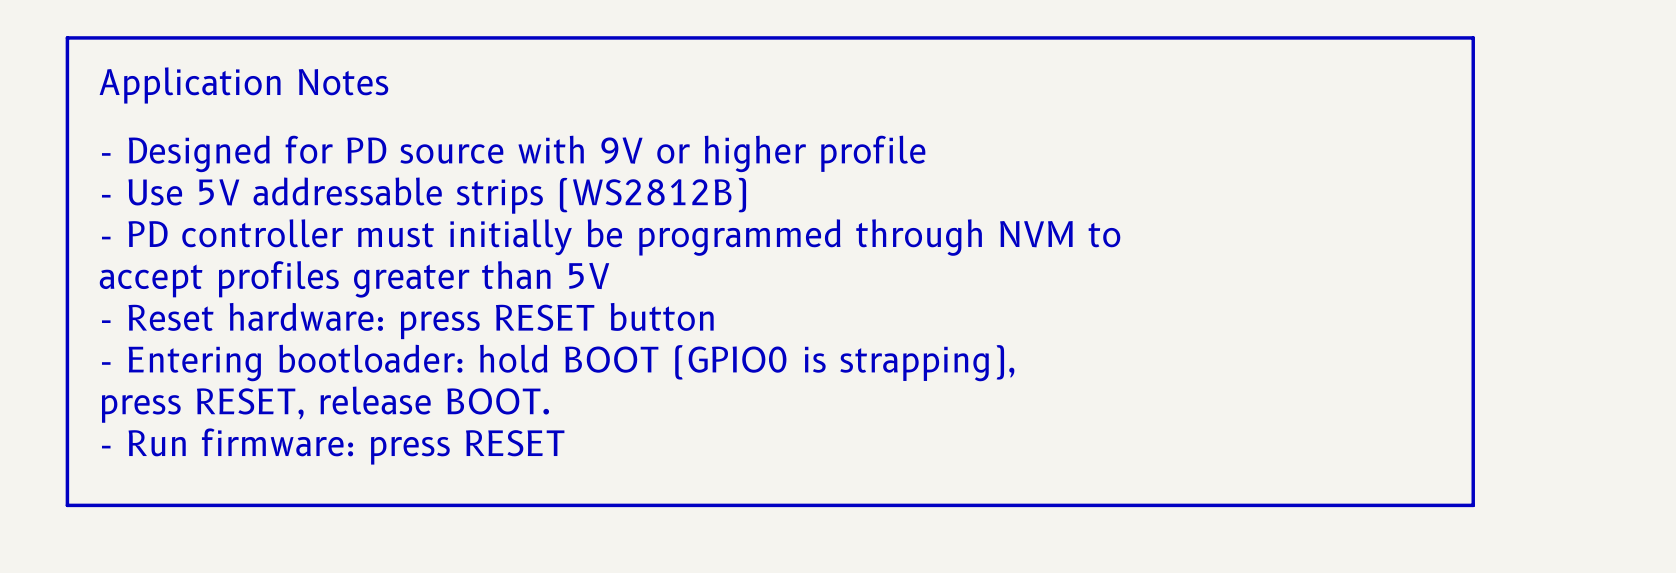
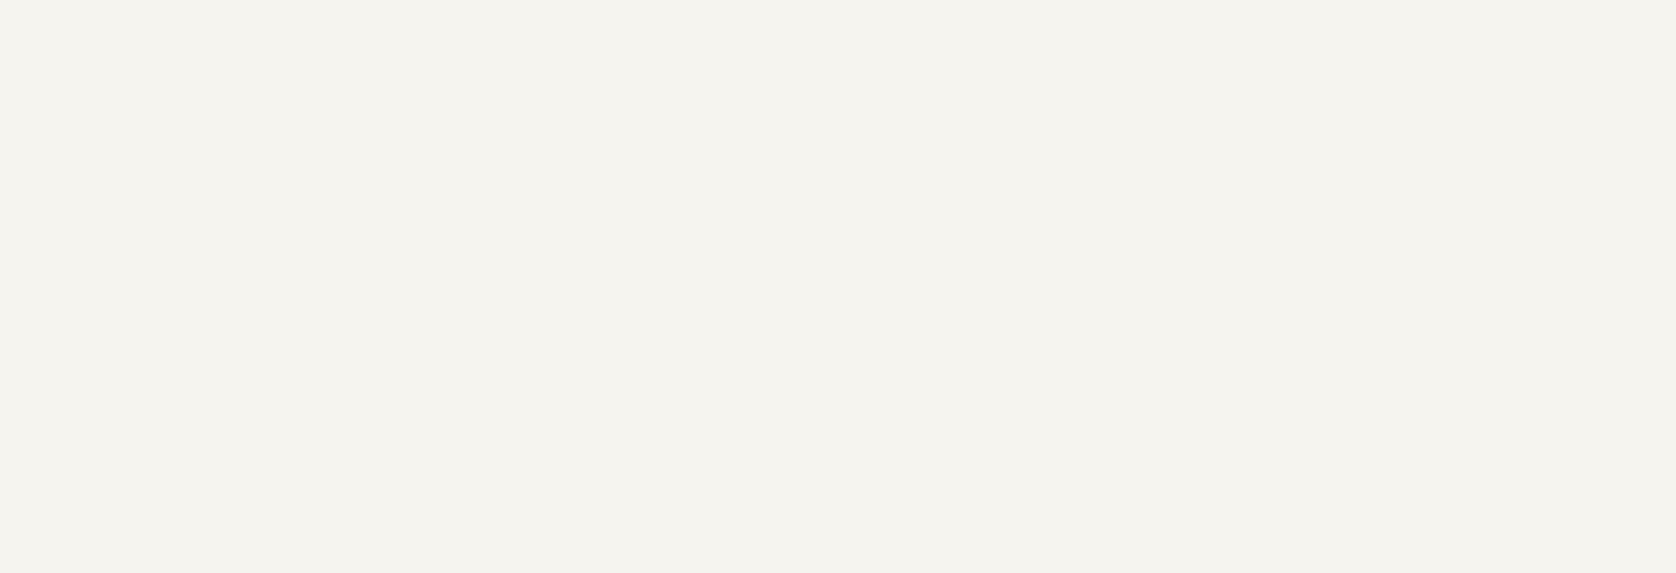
line: (67, 37) (1473, 37) (1473, 505) (67, 505) (67, 37) -> none
text: Application Notes (243, 85) -> none
text: - Designed for PD source with 9V or higher profile (513, 153) -> none
text: - Use 5V addressable strips (WS2812B) (424, 195) -> none
text: - PD controller must initially be programmed through NVM to (611, 237) -> none
text: accept profiles greater than 5V (354, 279) -> none
text: - Reset hardware: press RESET button (407, 321) -> none
text: - Entering bootloader: hold BOOT (GPIO0 is strapping), (558, 362) -> none
text: press RESET, release BOOT. (325, 404) -> none
text: - Run firmware: press RESET (333, 446) -> none

